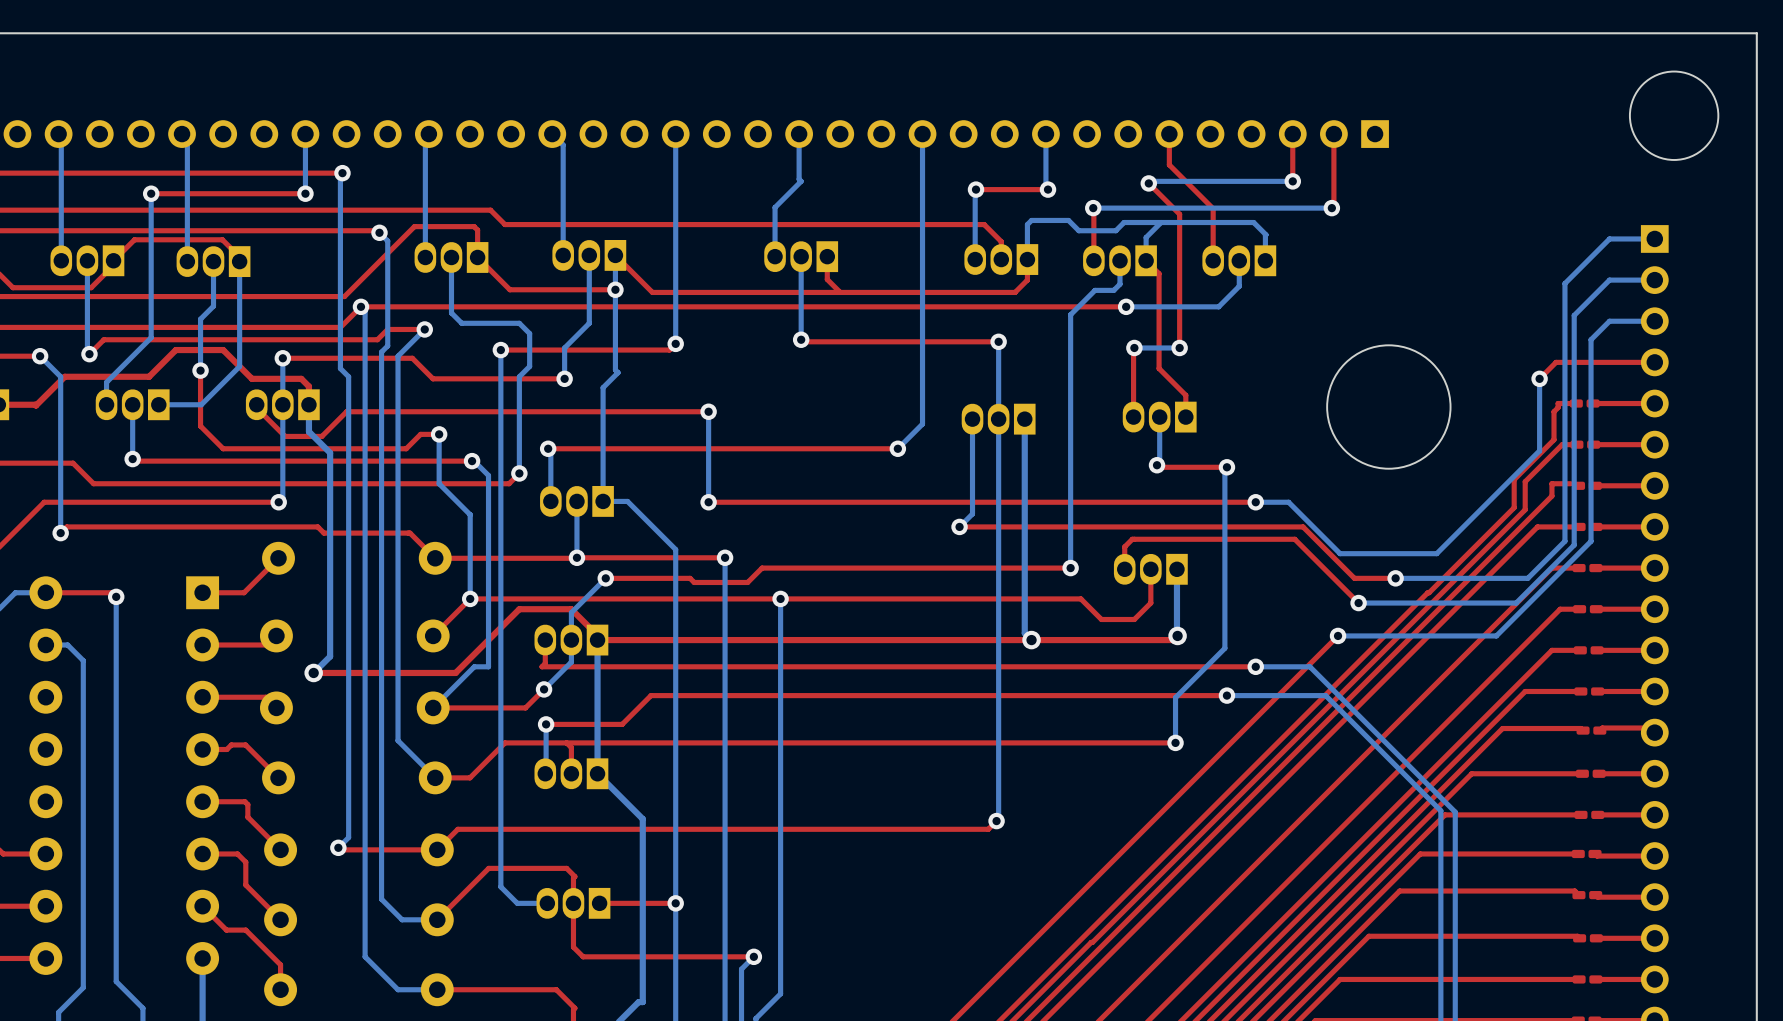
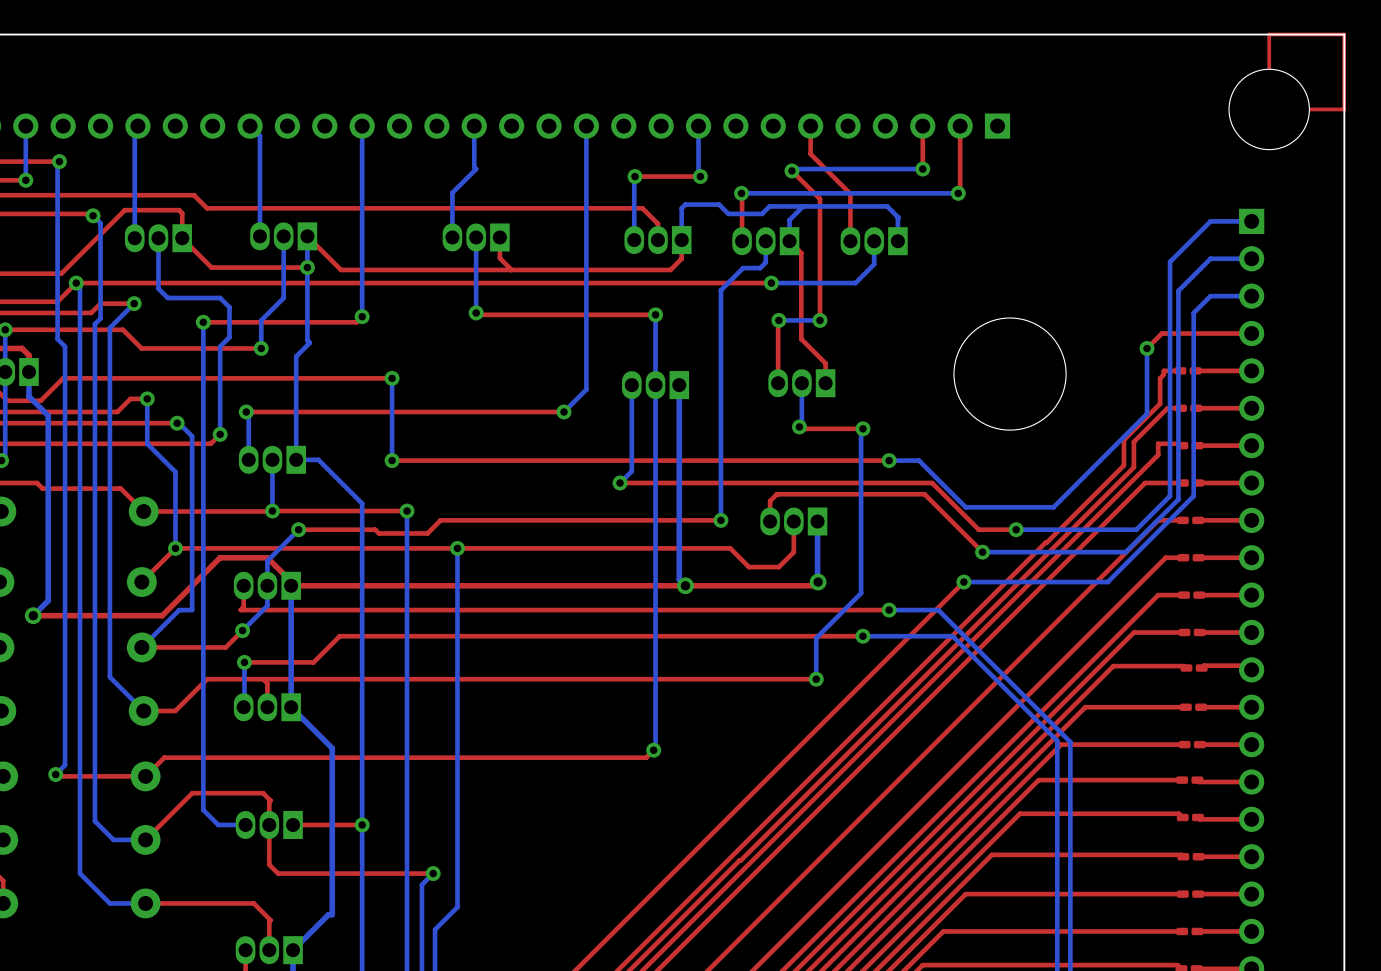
top track: none -> (1344, 34) (1269, 34) (1269, 109) (1344, 109) (1344, 34)

